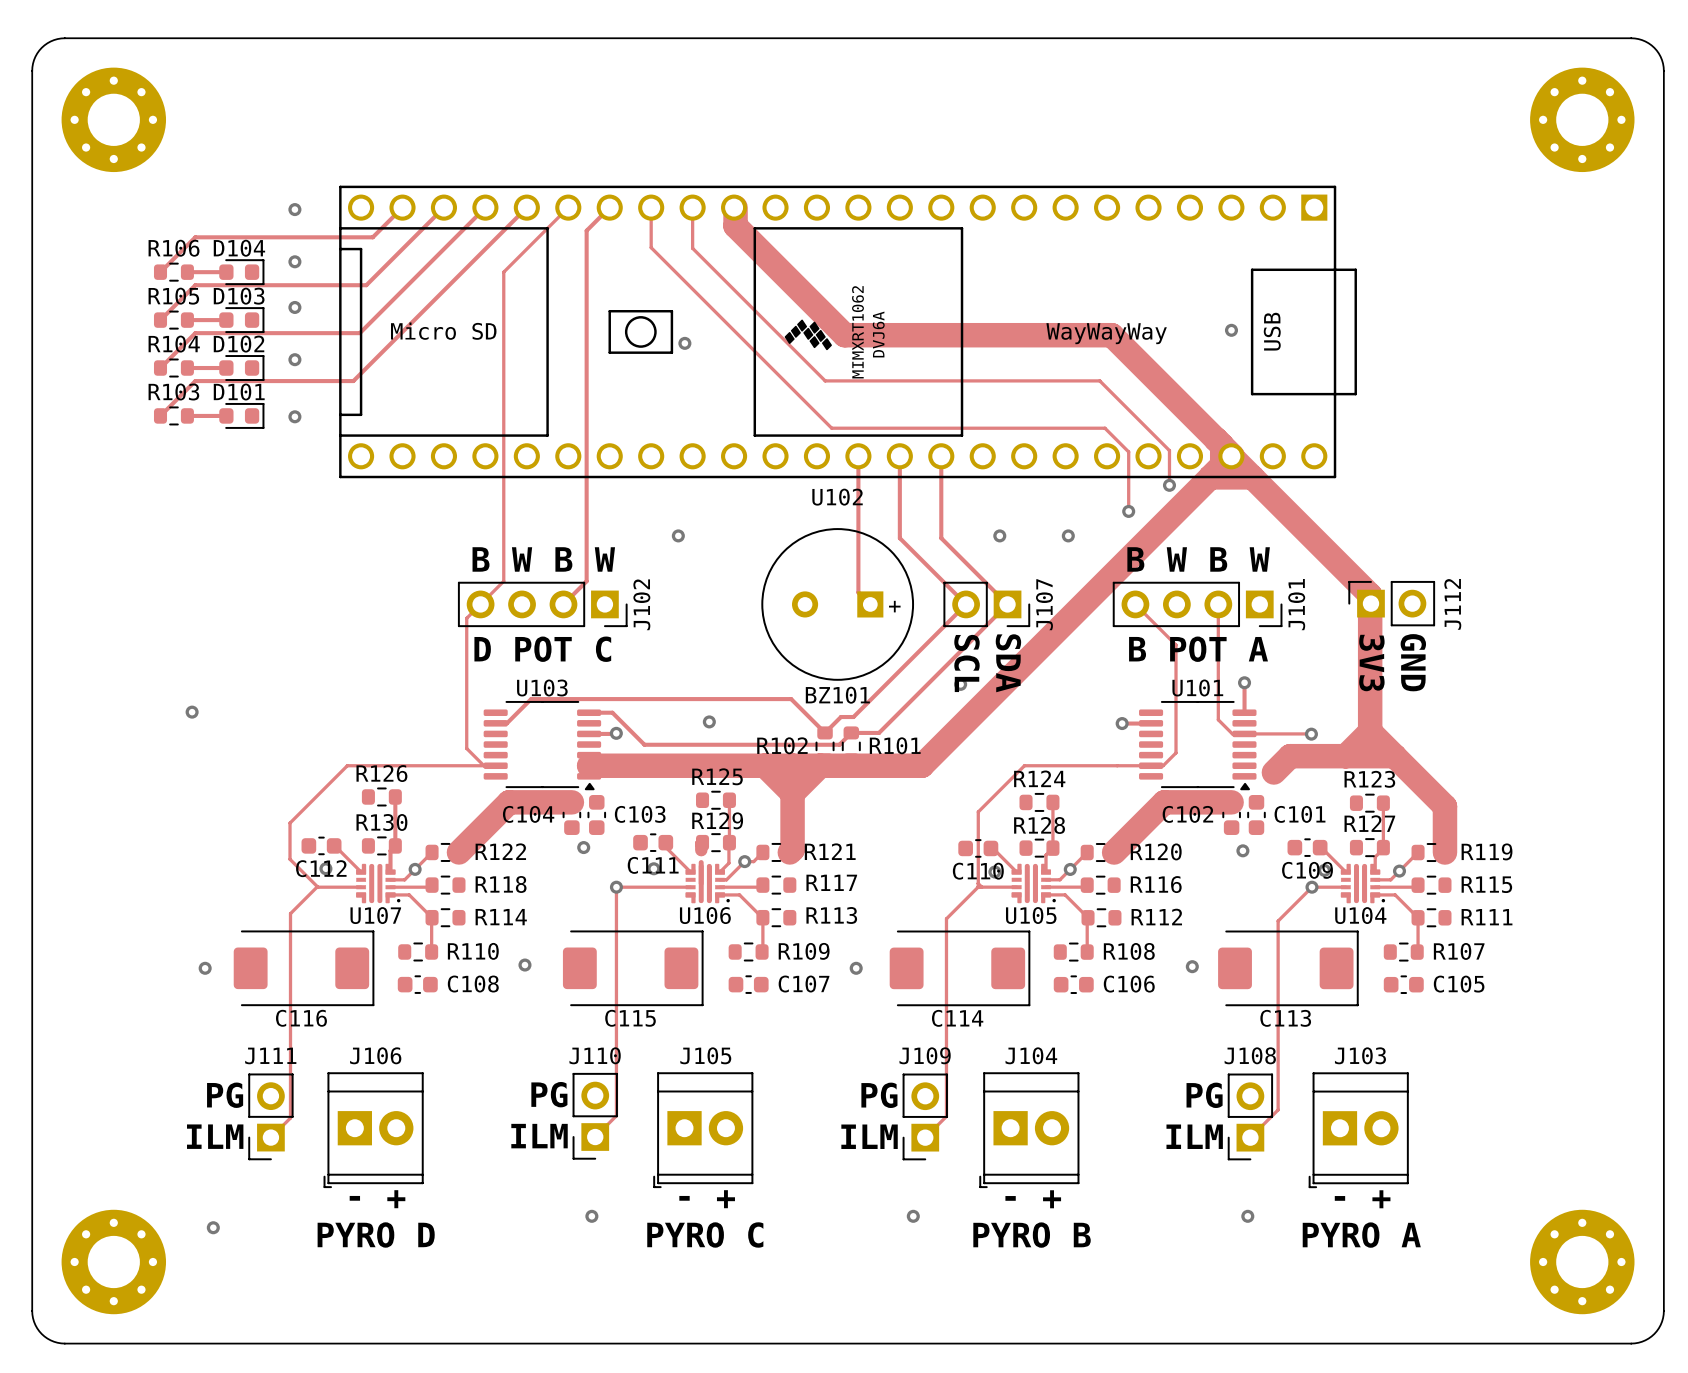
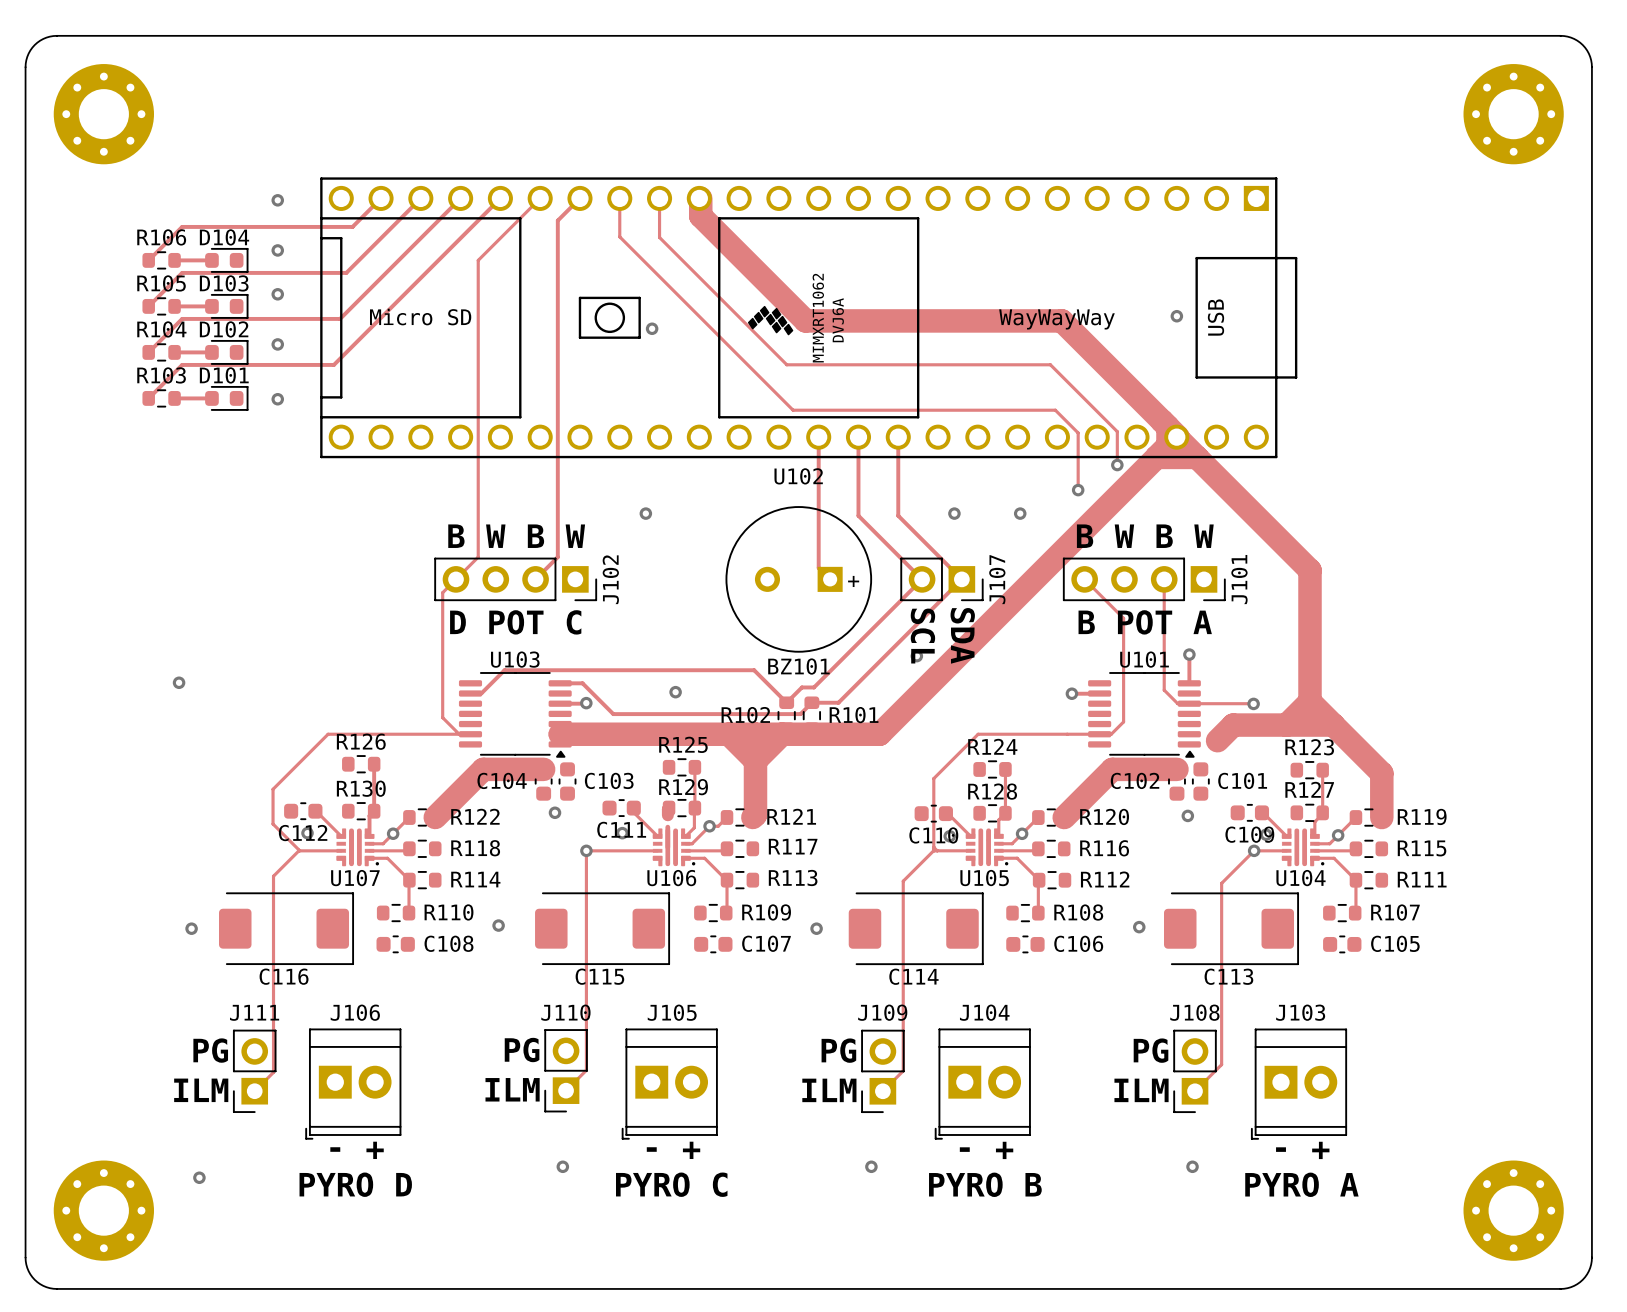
J112: (1391, 603) -> none
text: GND (1413, 662) -> none
text: 3V3 (1371, 663) -> none

